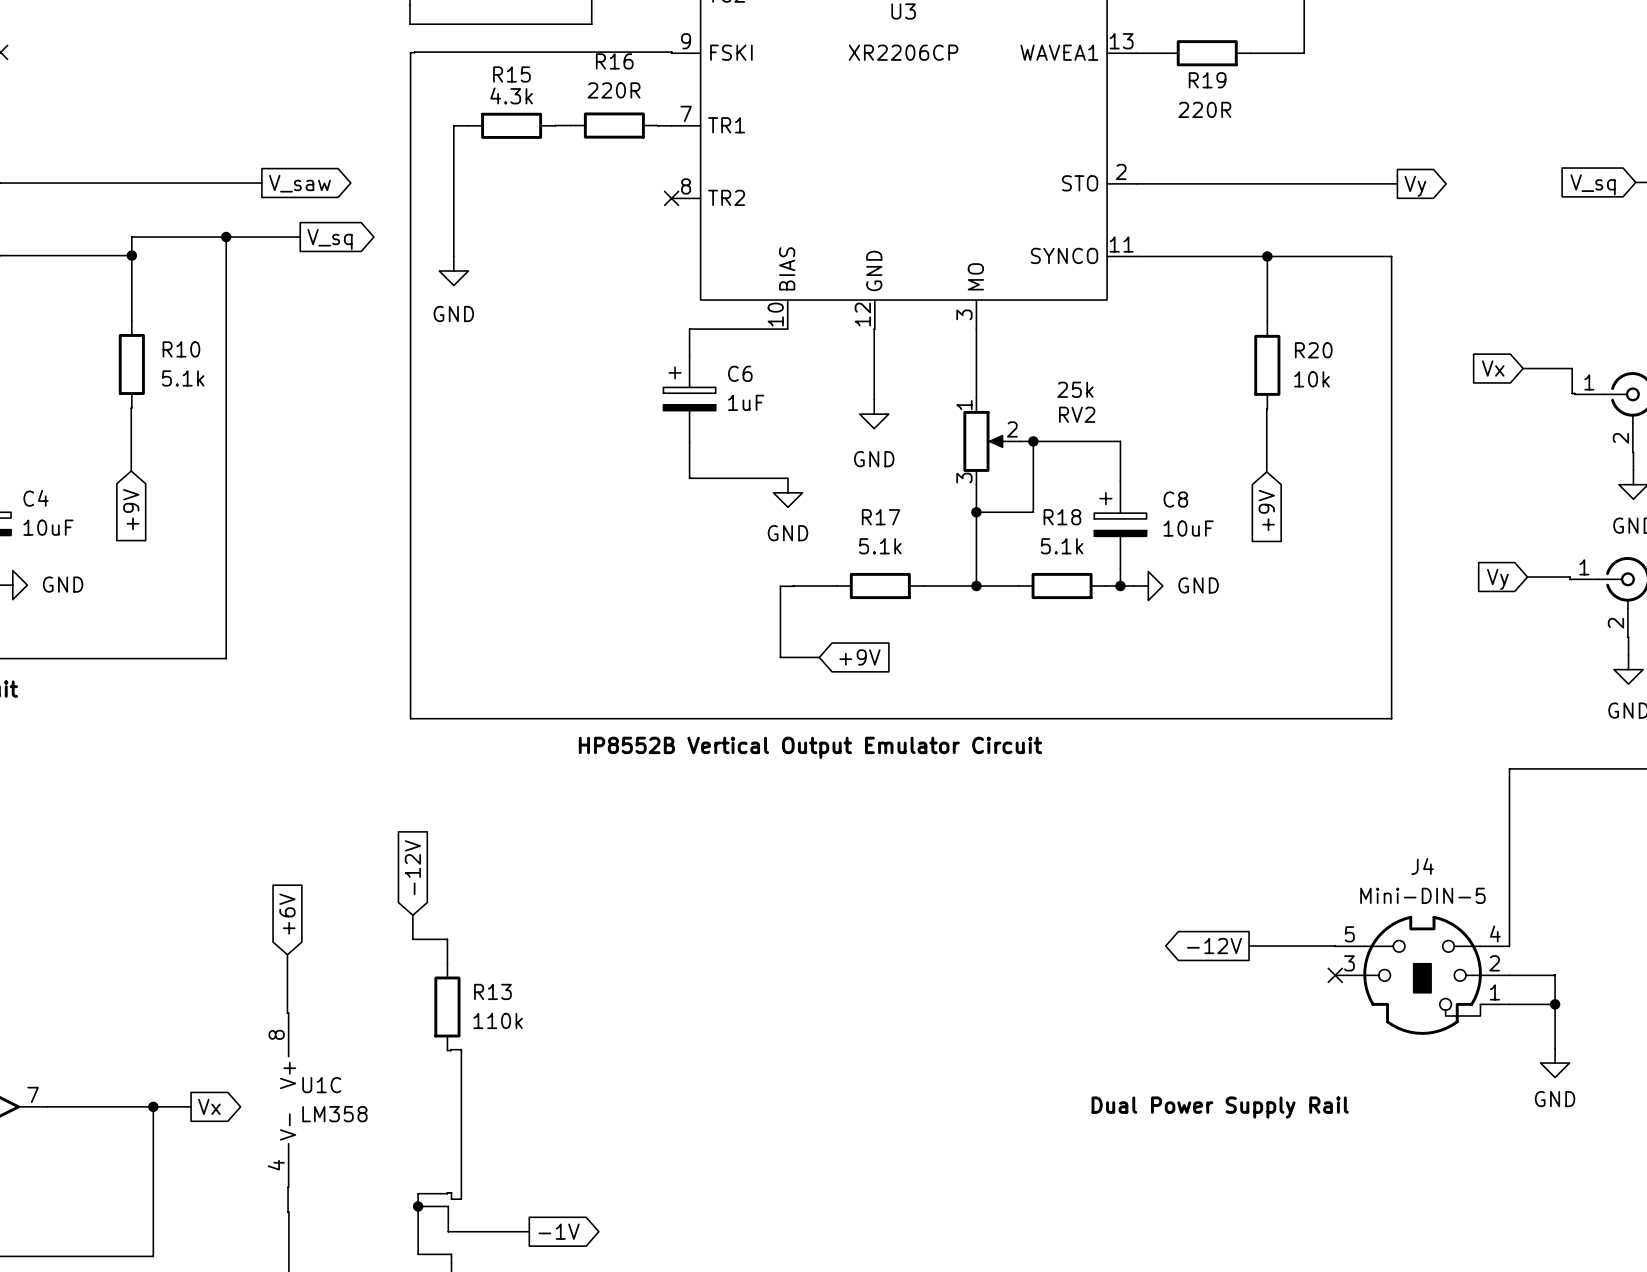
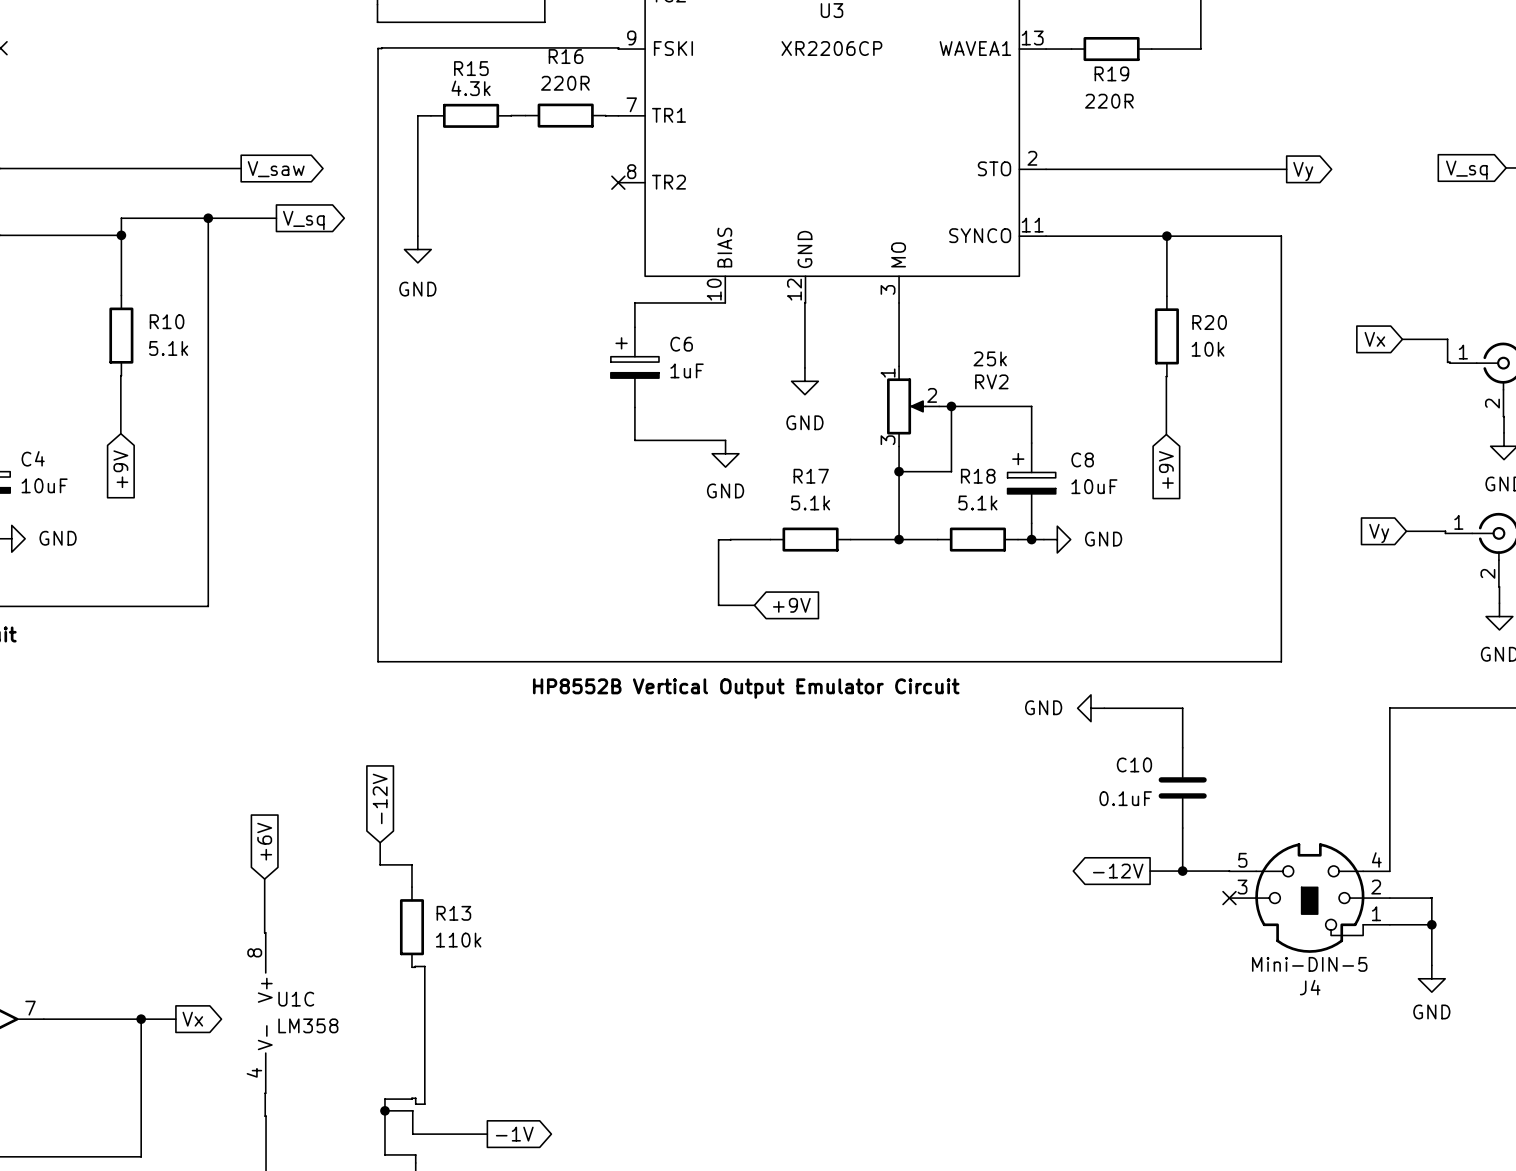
power symbol: none -> GND (1090, 708)
wire: none -> (1104, 708) (1182, 708) (1182, 747)
C10: none -> 0.1uF (1182, 787)
J4 name position: J4 (1422, 866) -> J4 (1310, 987)
J4 value position: Mini-DIN-5 (1422, 895) -> Mini-DIN-5 (1309, 964)
wire: none -> (1182, 828) (1182, 871)
junction: none -> (1182, 871)
text: Dual Power Supply Rail (1220, 1107) -> none

